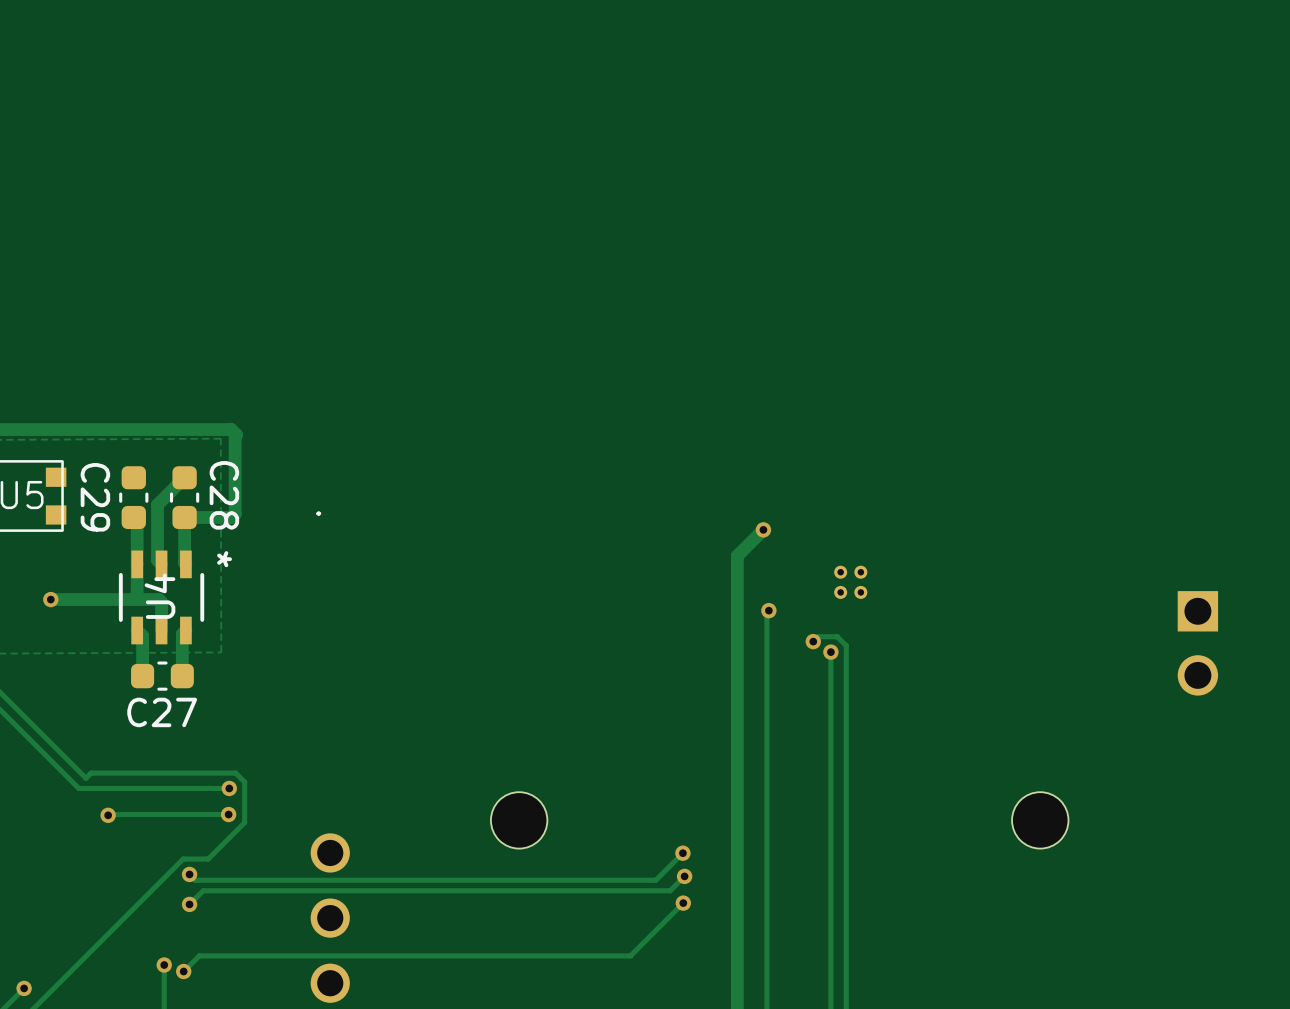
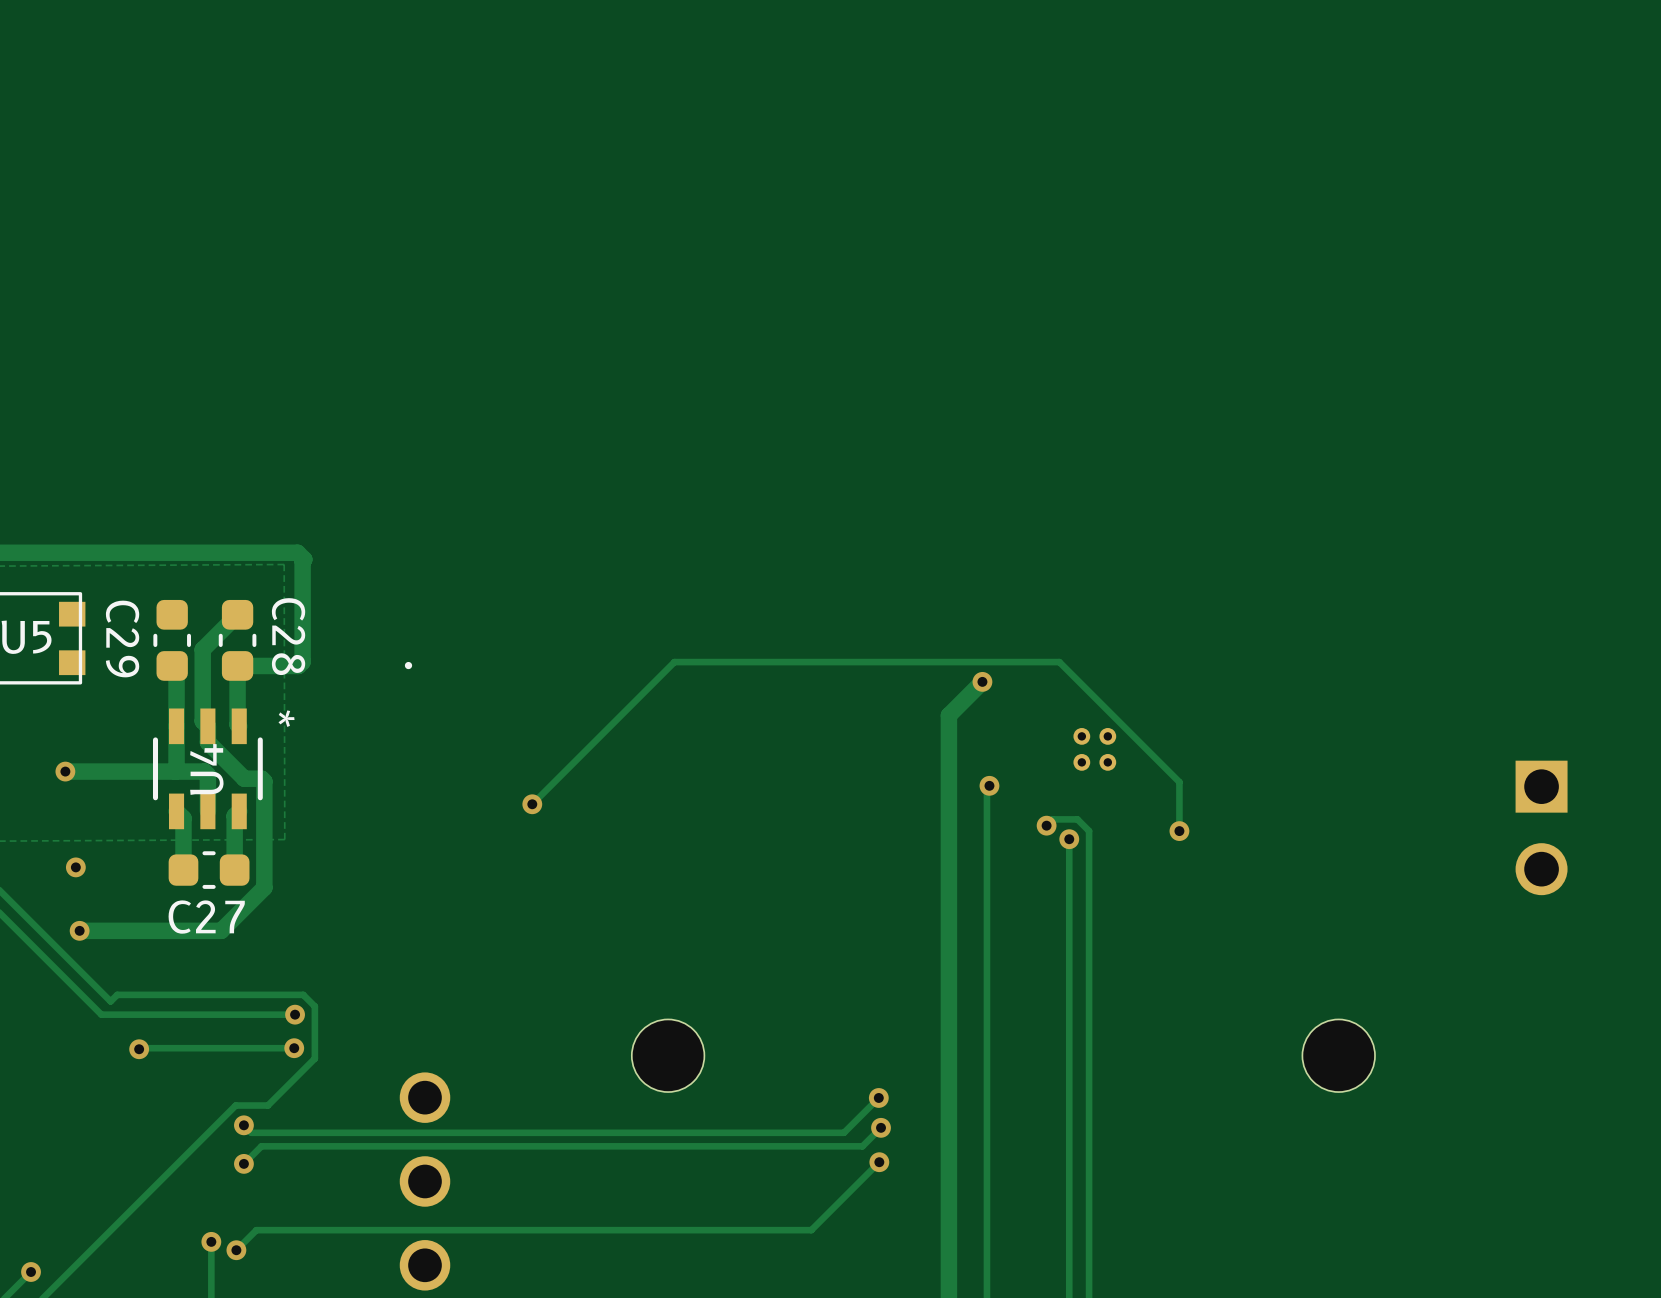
track: none -> (207, 726) (207, 742) (244, 778) (261, 778) (264, 781) (264, 887) (221, 930) (79, 930)
track: none -> (532, 804) (674, 662) (1059, 662) (1179, 782) (1179, 831)
via: none -> (532, 804)
via: none -> (1179, 831)
via: none -> (75, 867)
via: none -> (79, 930)

